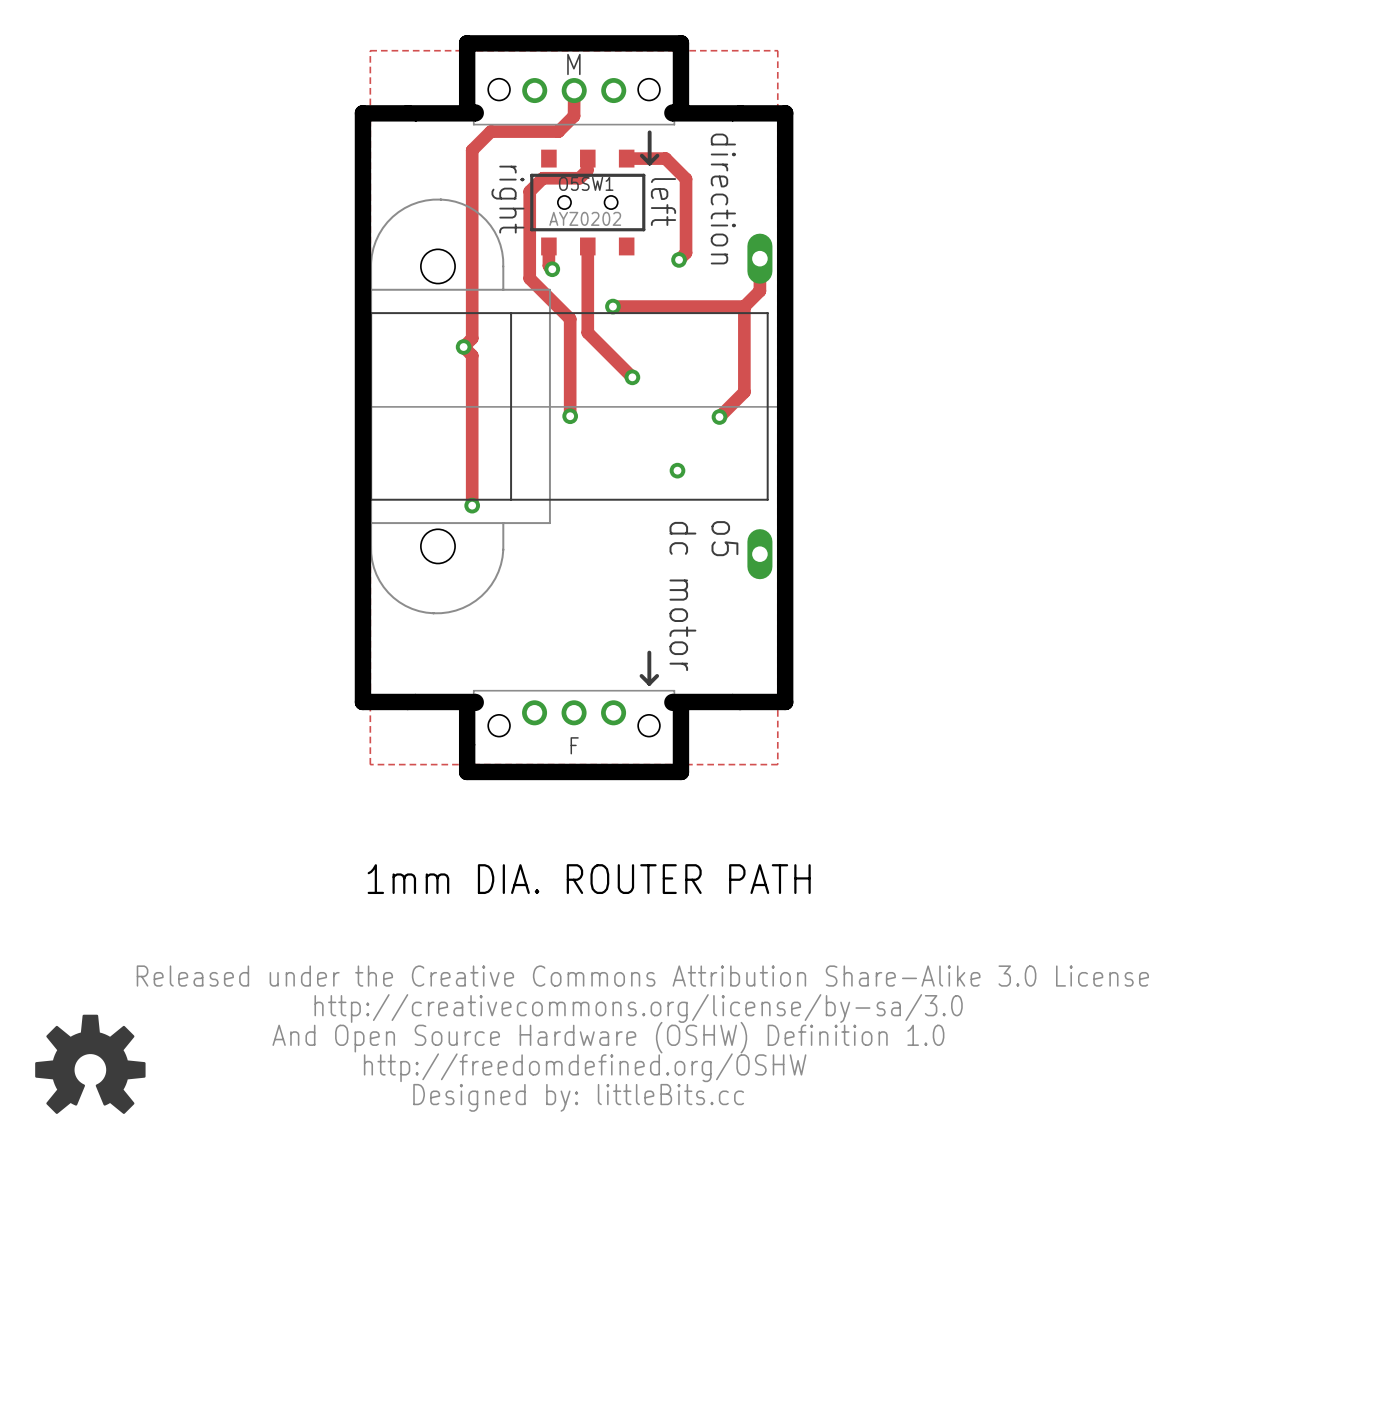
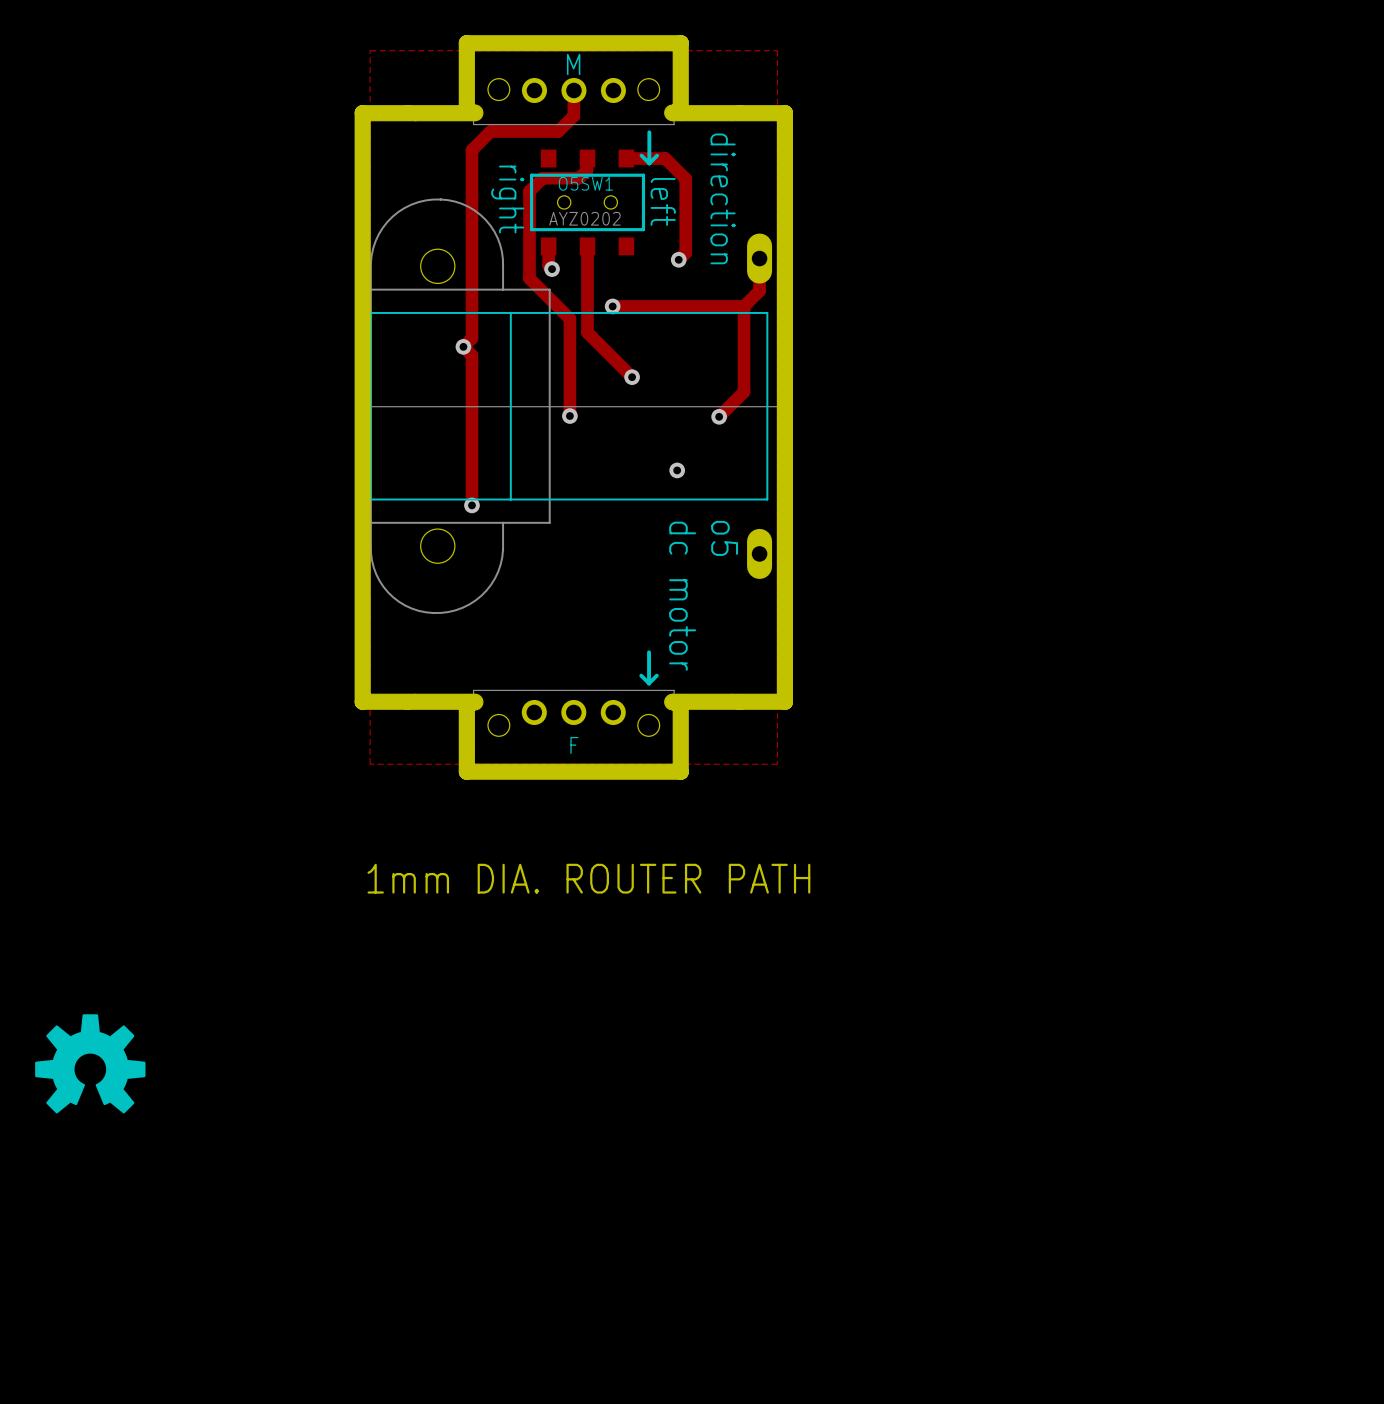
drawing: [136, 965, 1150, 1112] -> none

